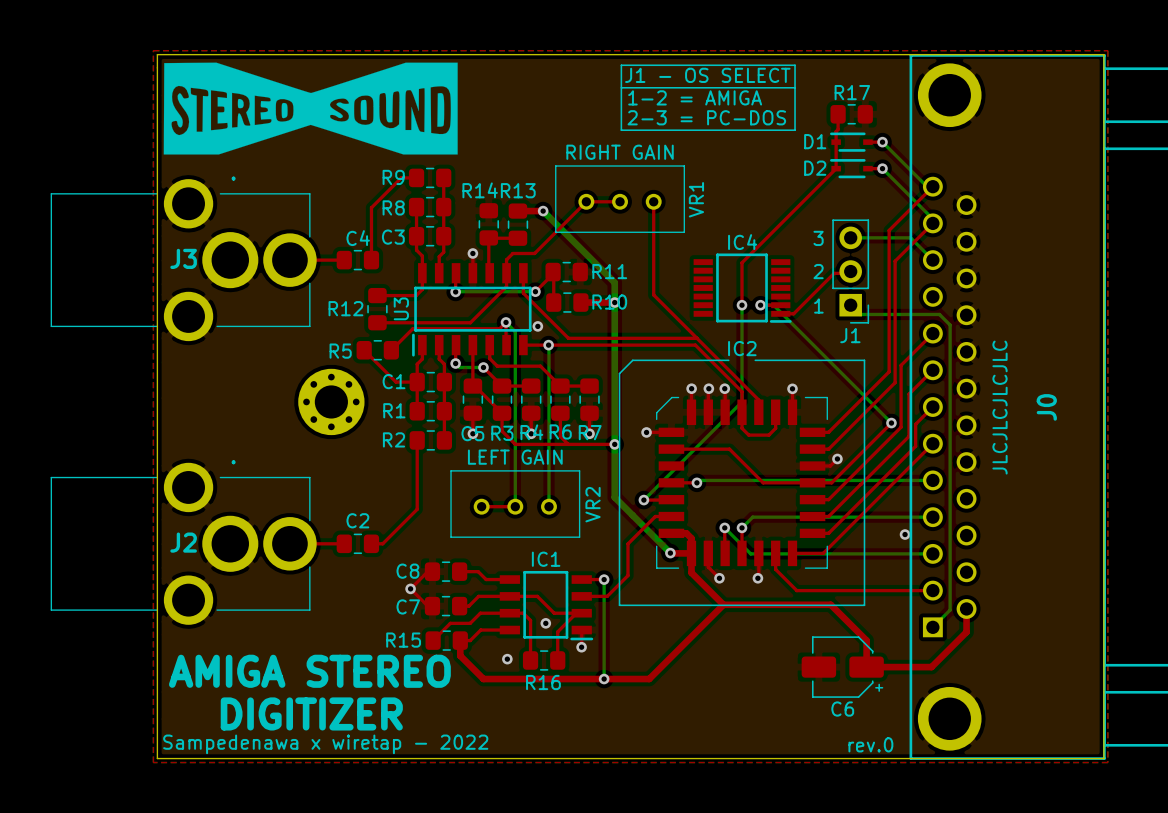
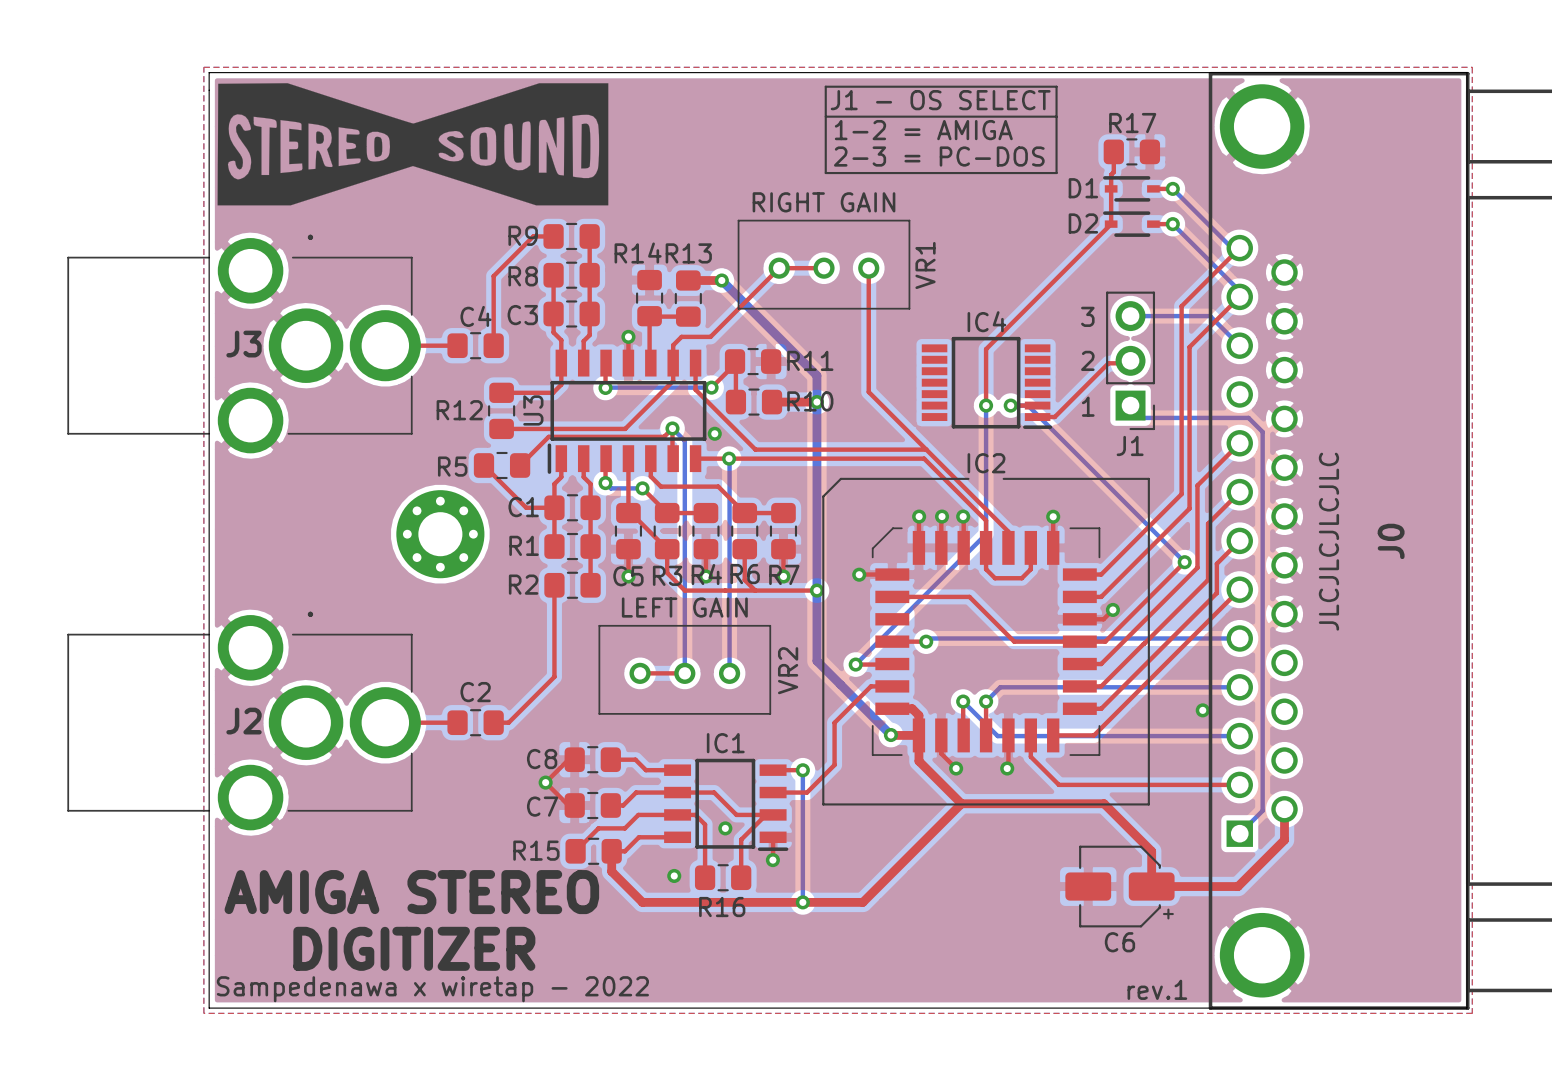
text: rev.0 (870, 744) -> rev.1 (1157, 989)

